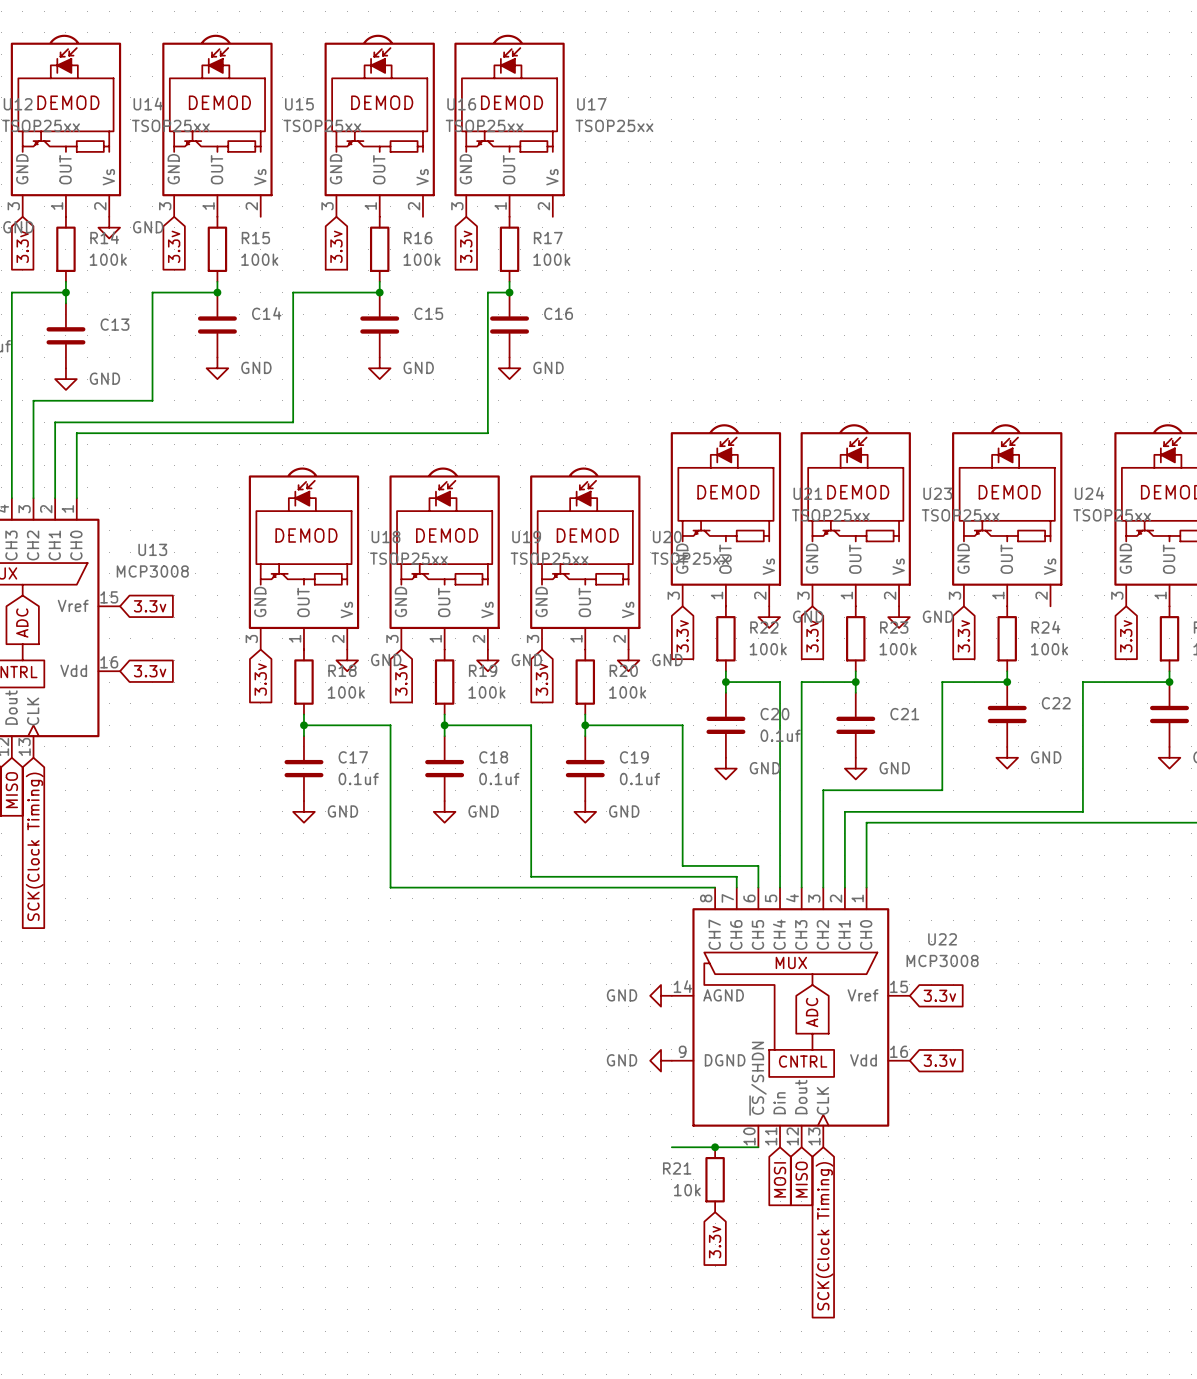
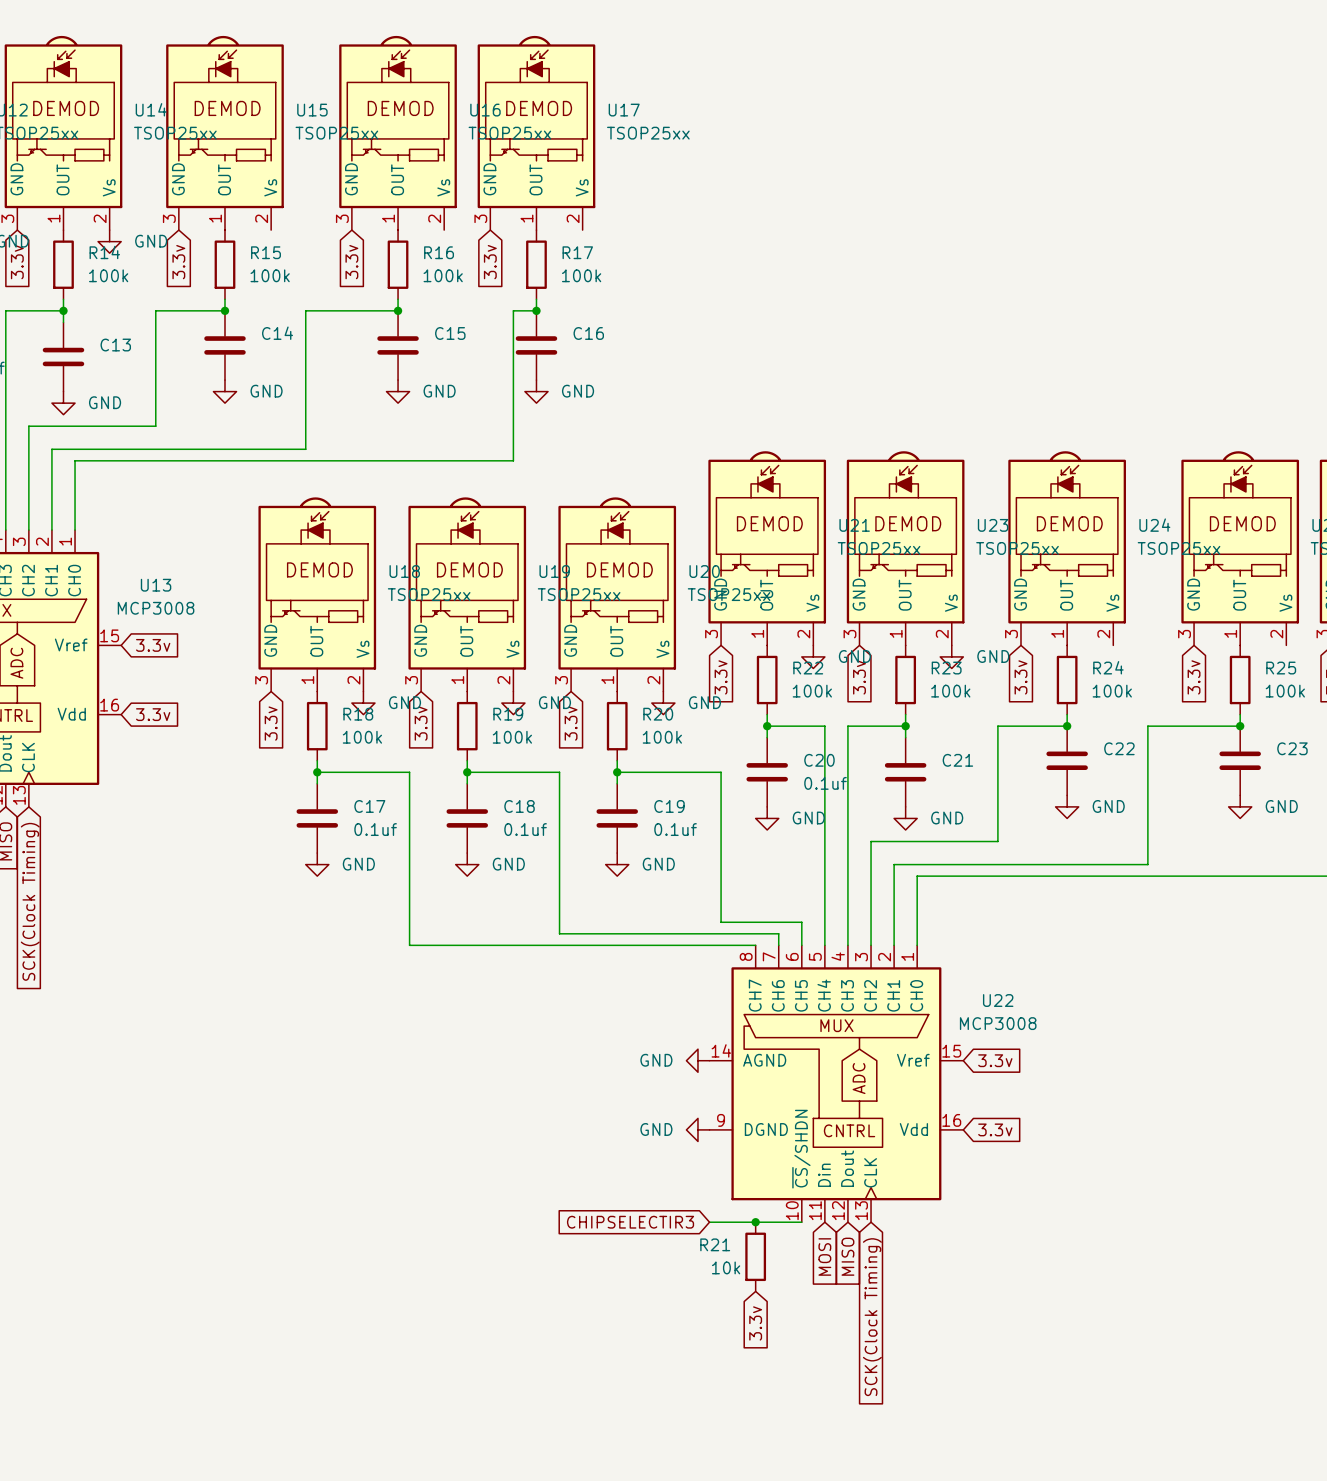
global label: none -> CHIPSELECTIR3 (630, 1222)

